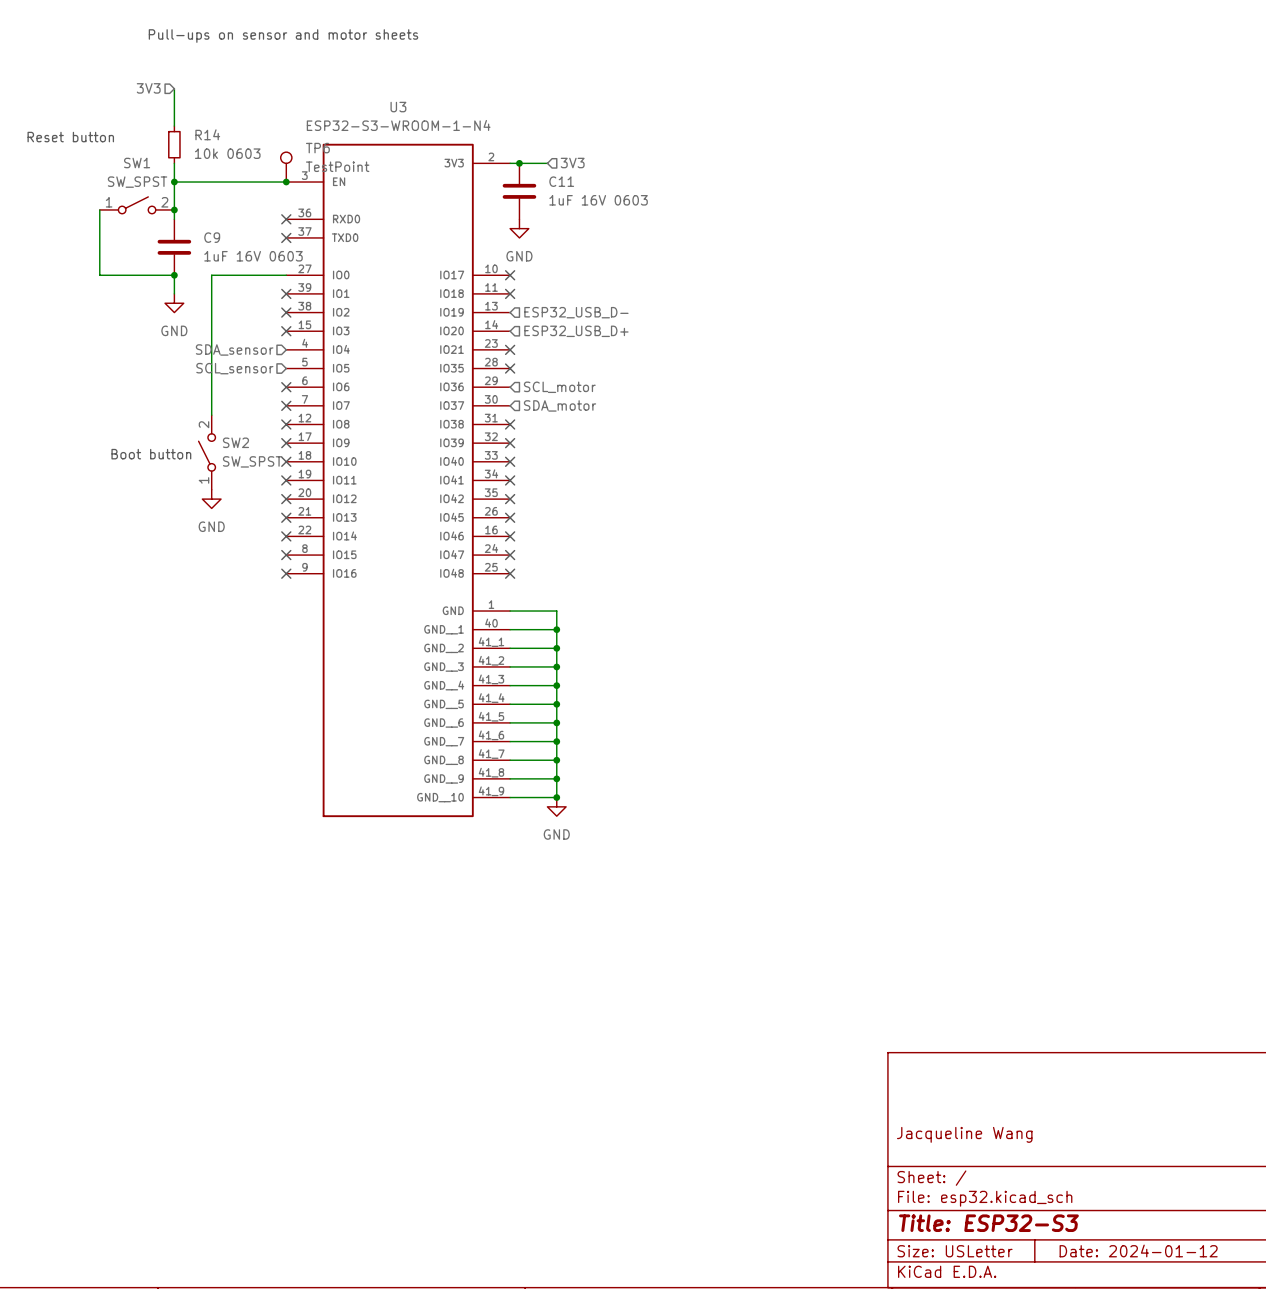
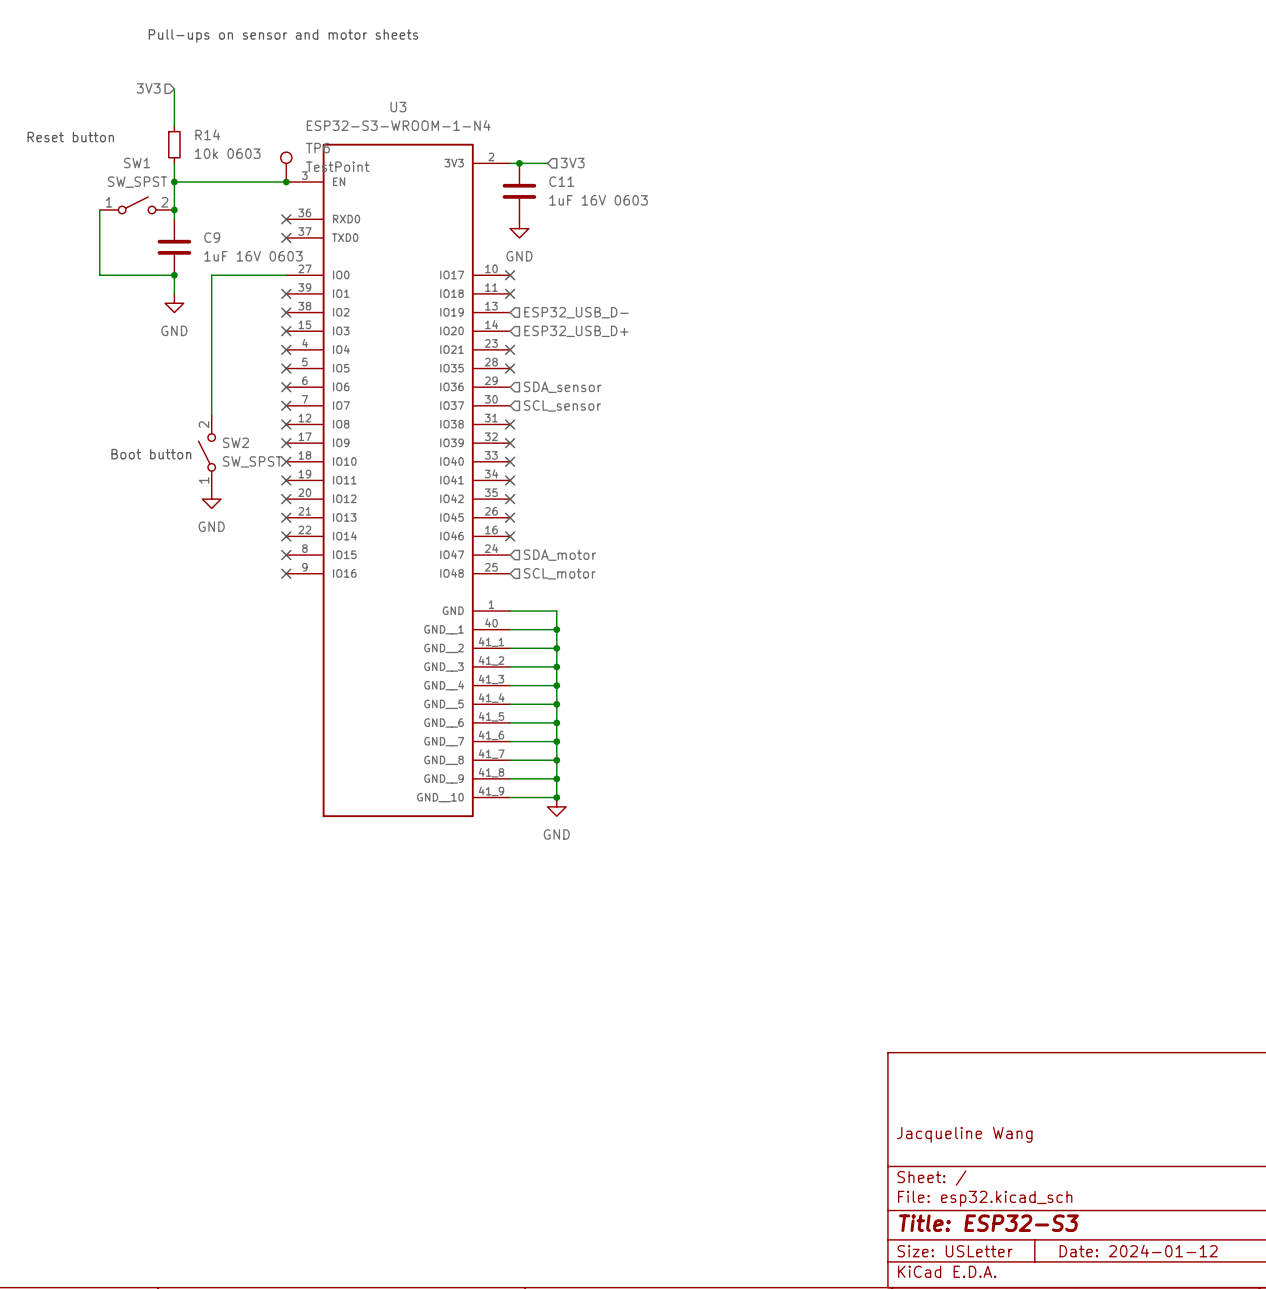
hierarchical label: SDA_sensor (234, 349) -> none
no-connect mark: none -> (286, 349)
hierarchical label: SCL_sensor (234, 368) -> none
no-connect mark: none -> (286, 368)
hierarchical label: SCL_motor (559, 387) -> SDA_sensor (562, 387)
hierarchical label: SDA_motor (560, 405) -> SCL_sensor (562, 405)
no-connect mark: (510, 555) -> none
hierarchical label: none -> SDA_motor (560, 555)
no-connect mark: (510, 573) -> none
hierarchical label: none -> SCL_motor (559, 573)

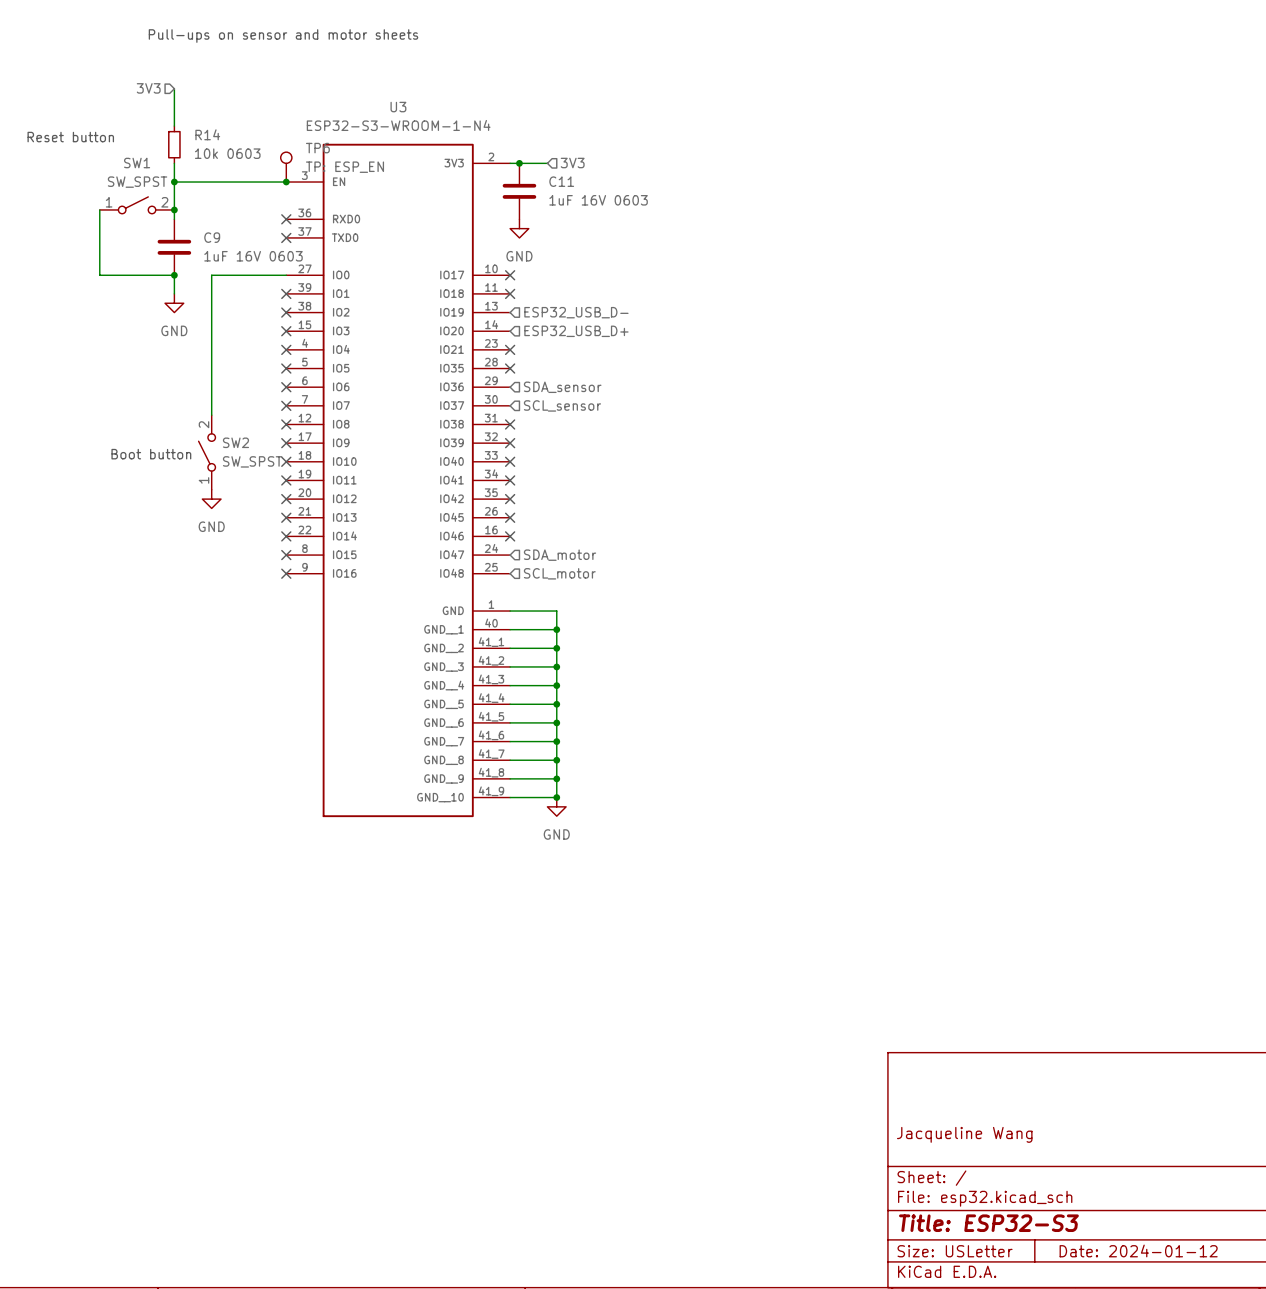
TP6 value: TestPoint (337, 166) -> TP: ESP_EN (344, 167)

